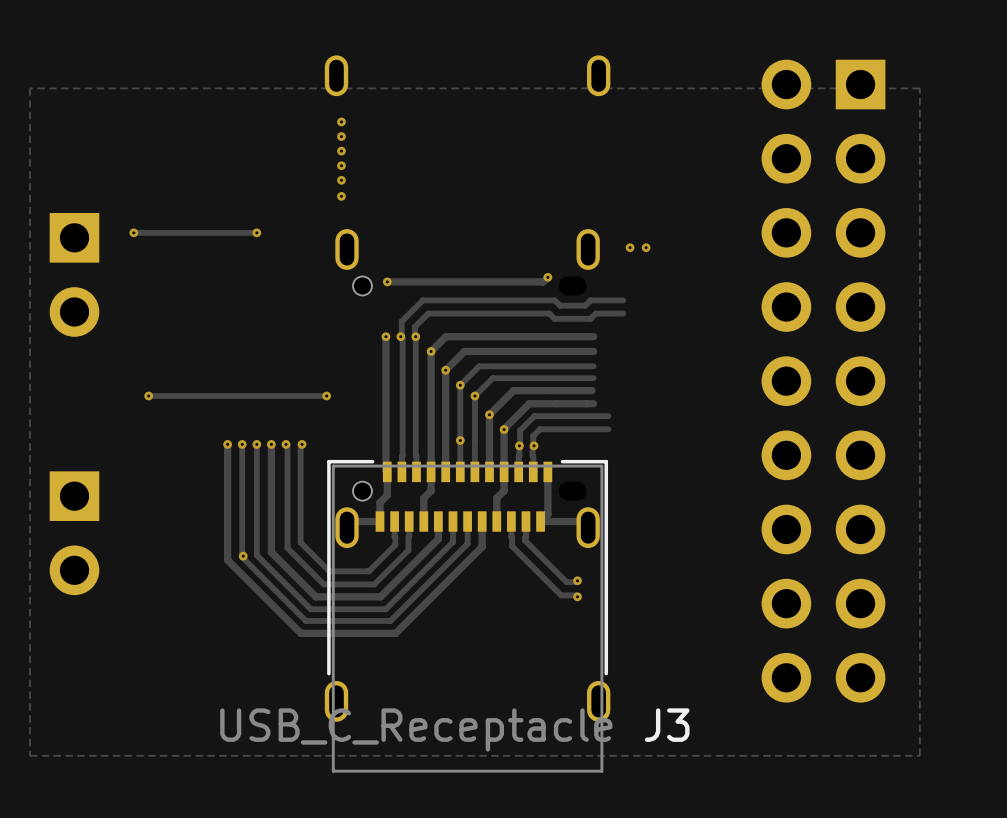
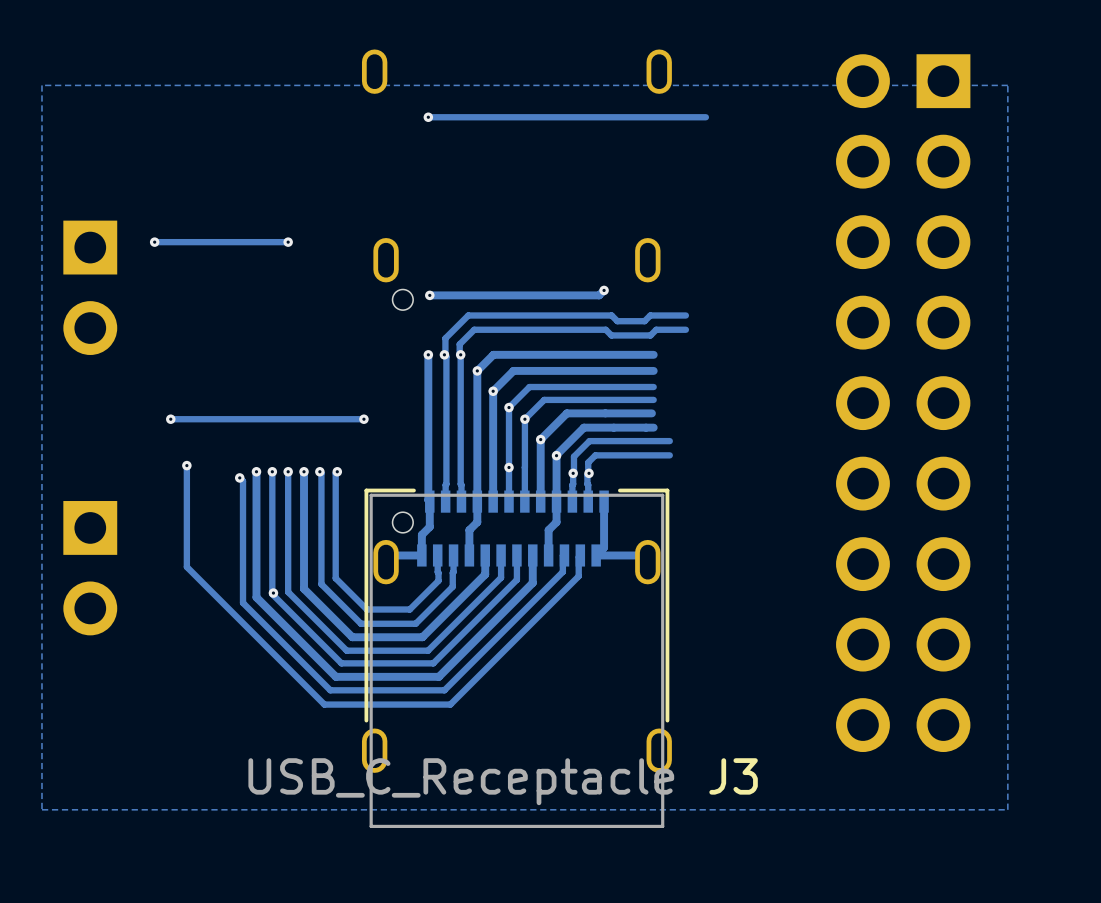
via: none -> (428, 117)
track: none -> (705, 117) (428, 117)
via: (341, 121) -> none
via: (341, 136) -> none
via: (341, 151) -> none
via: (341, 165) -> none
via: (341, 180) -> none
via: (341, 196) -> none
via: (630, 247) -> none
via: (646, 247) -> none
via: none -> (186, 465)
via: none -> (239, 477)
track: (511, 521) (512, 546) (561, 595) (577, 596) -> (564, 555) (562, 555) (562, 571) (444, 690) (330, 690) (243, 602) (243, 481) (239, 477)
track: (525, 521) (525, 540) (566, 582) (577, 580) -> (580, 555) (578, 576) (450, 704) (324, 704) (186, 566) (186, 465)
via: (577, 580) -> none
via: (577, 596) -> none

